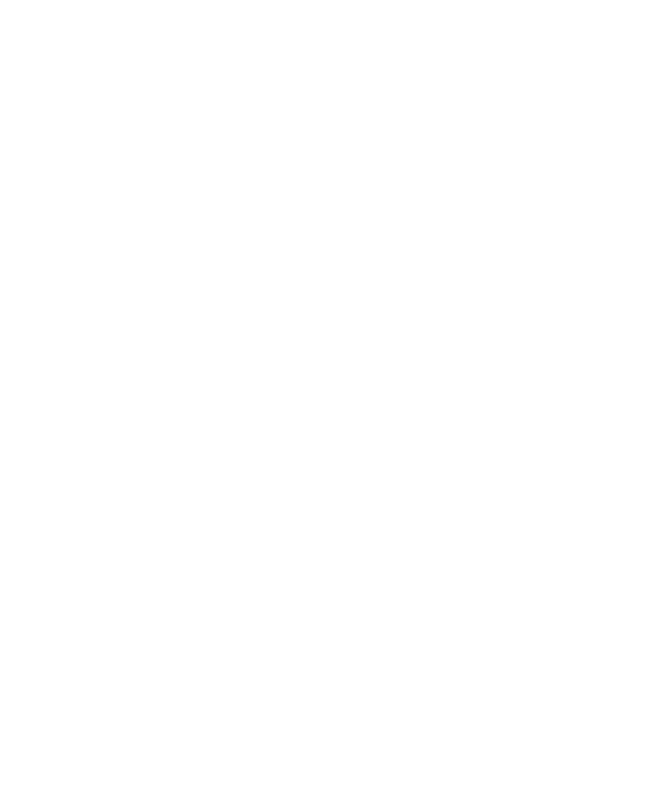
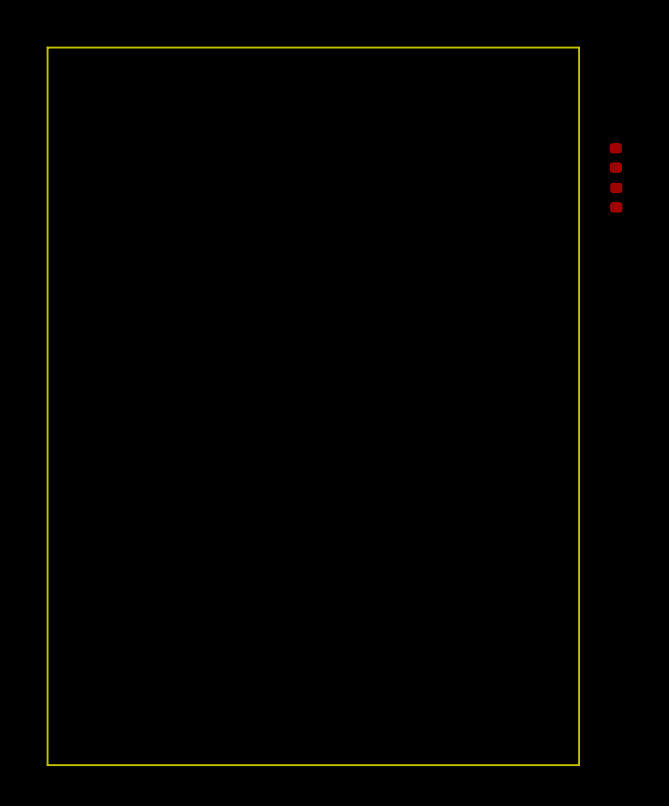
board edge: none -> (579, 47) (47, 47) (47, 765) (579, 765) (579, 47)
part: none -> (615, 157)
part: none -> (616, 197)

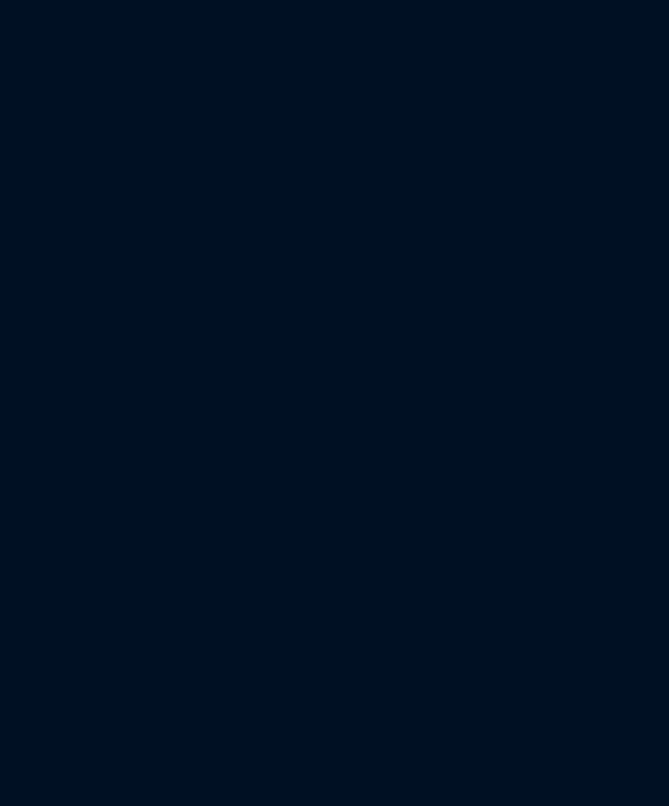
board edge: (579, 47) (47, 47) (47, 765) (579, 765) (579, 47) -> none
part: (615, 157) -> none
part: (616, 197) -> none

